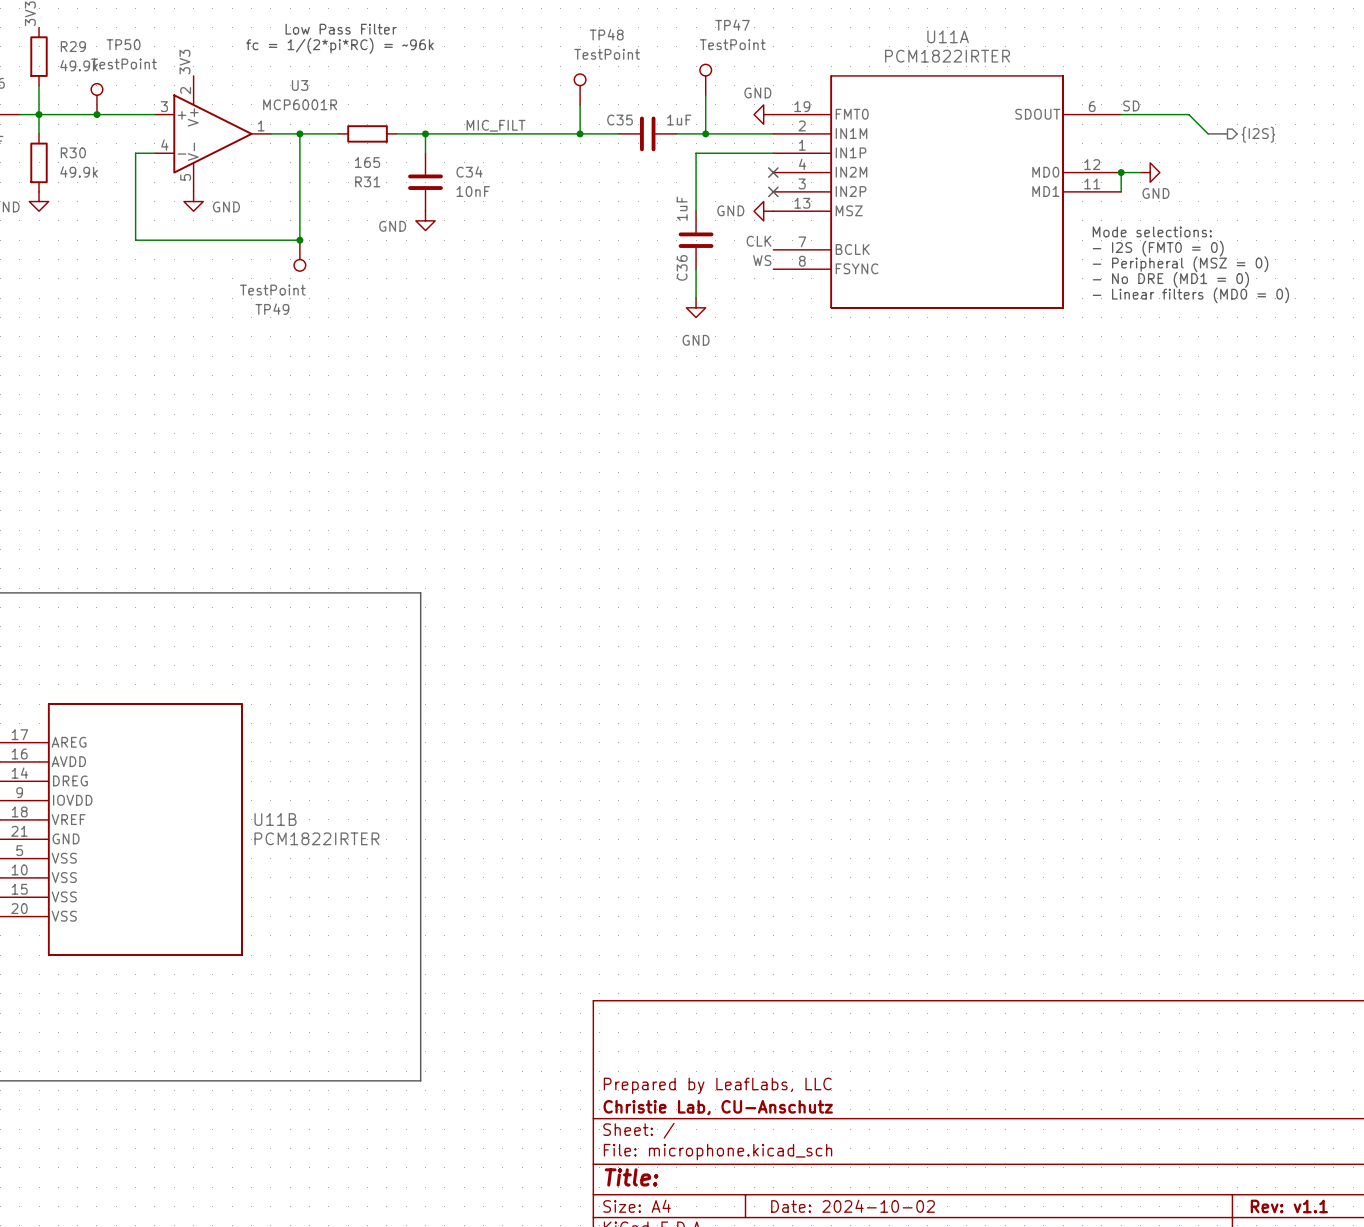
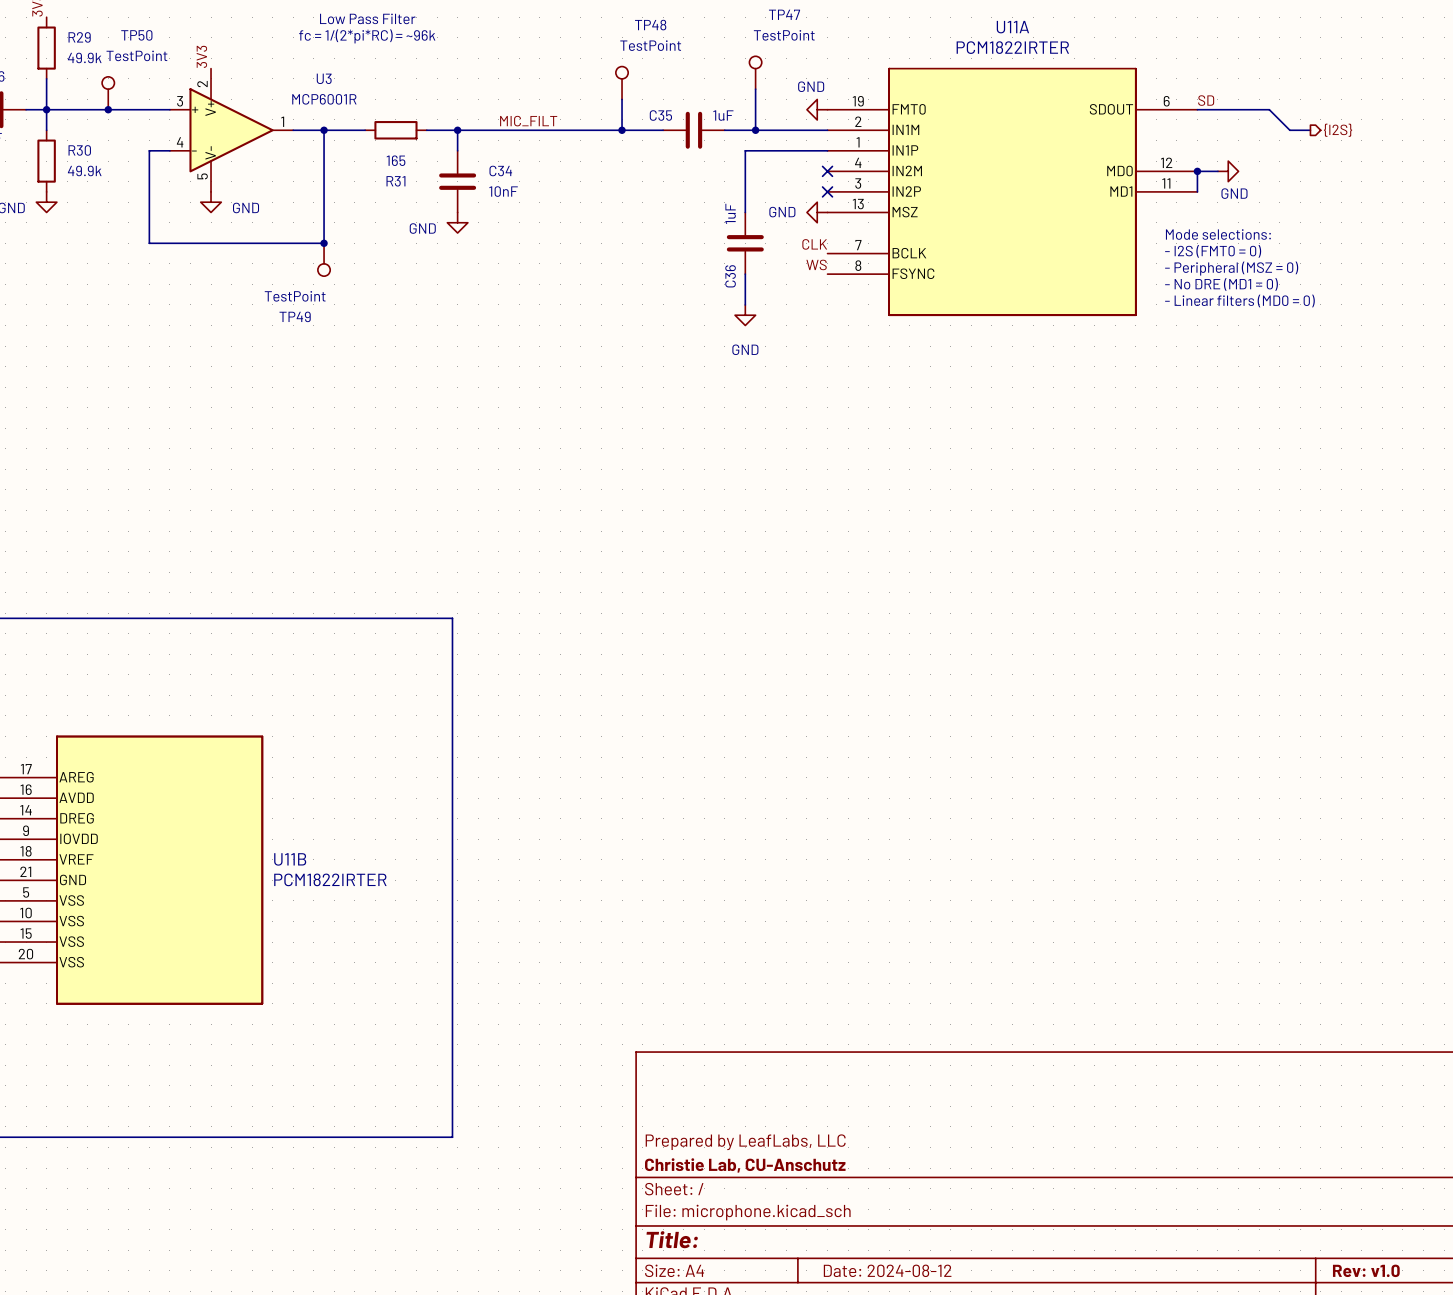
title block: Date: 2024-10-02 (853, 1206) -> Date: 2024-08-12 (887, 1270)
title block: Rev: v1.1 (1289, 1206) -> Rev: v1.0 (1366, 1270)

